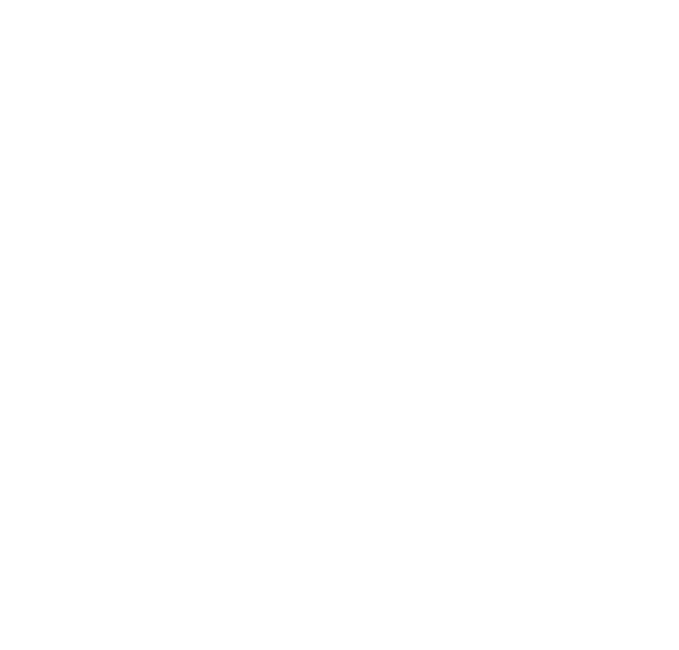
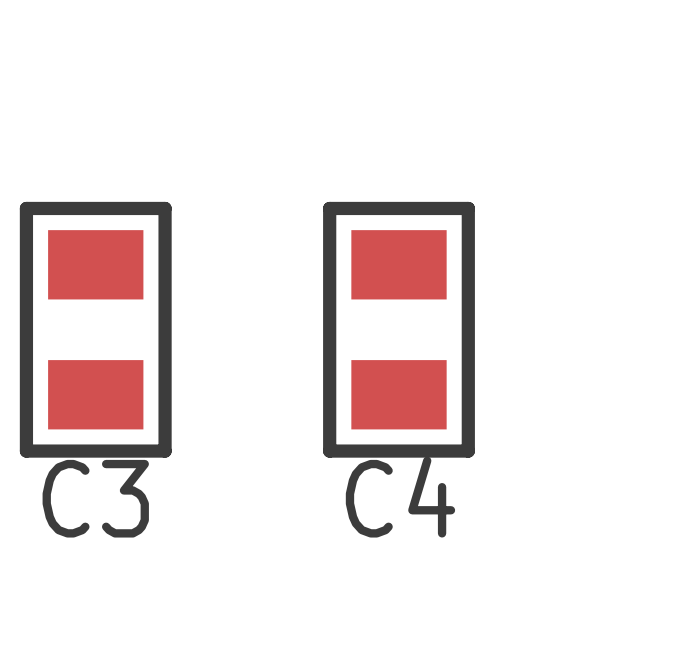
C3: none -> (95, 329)
C4: none -> (399, 329)

